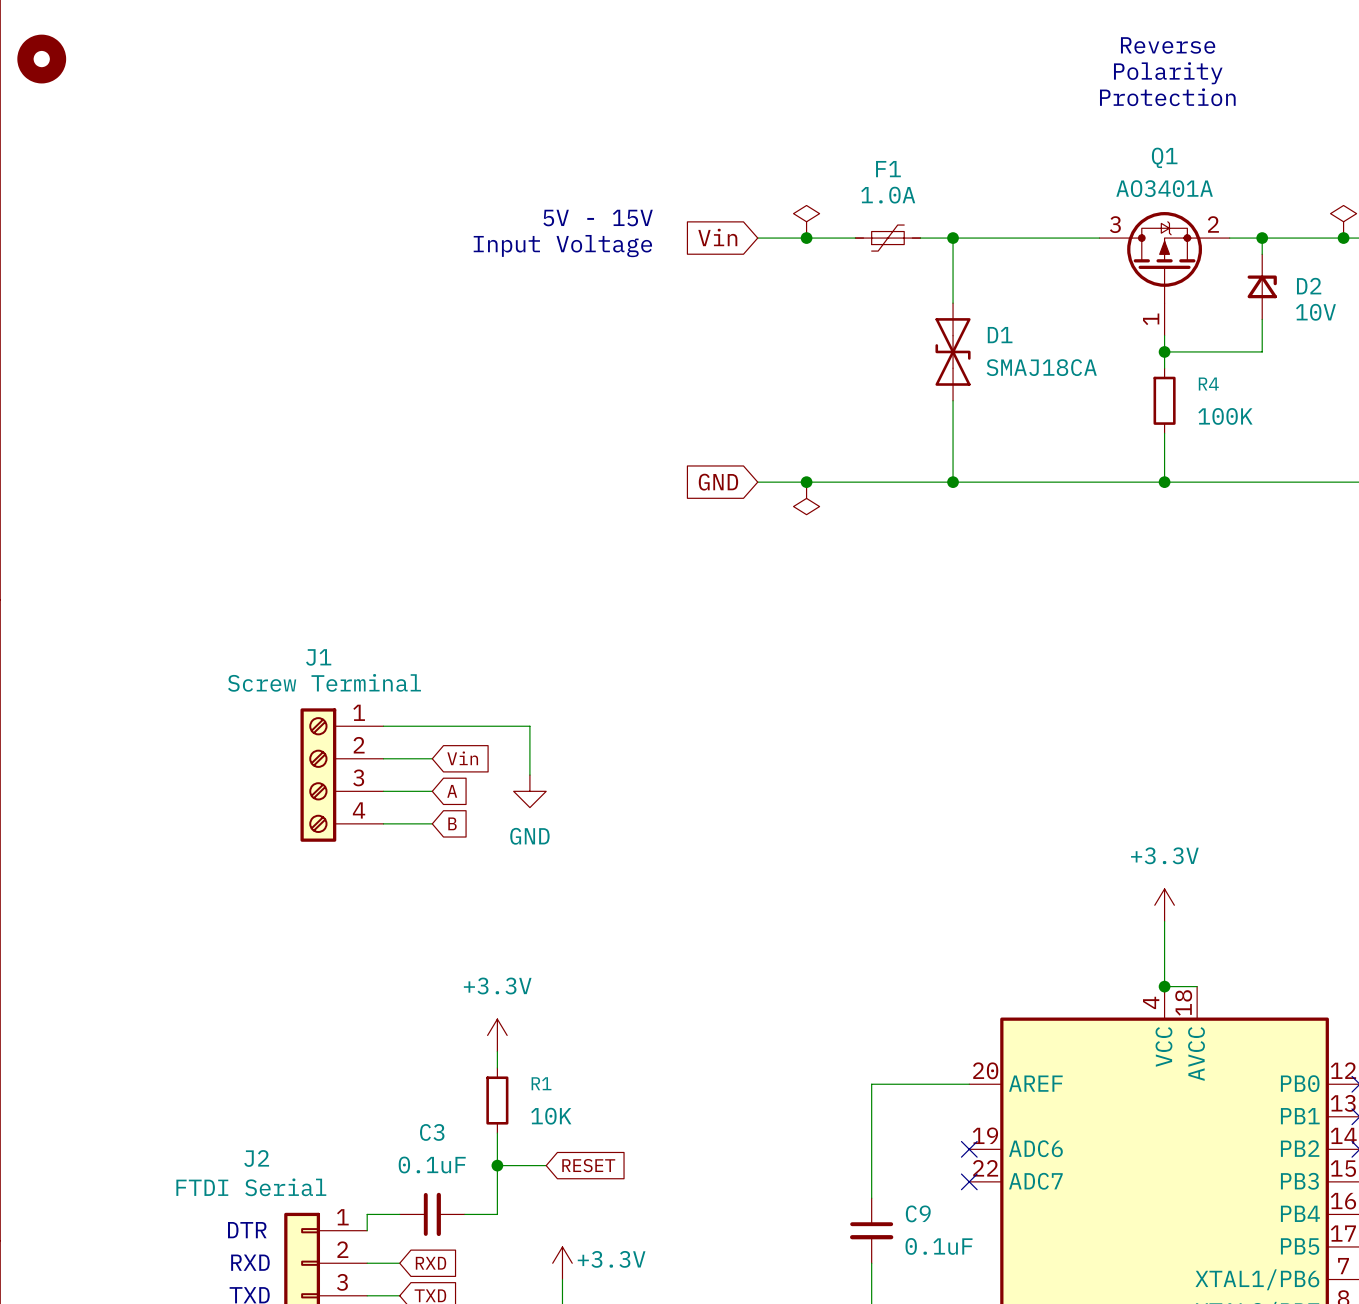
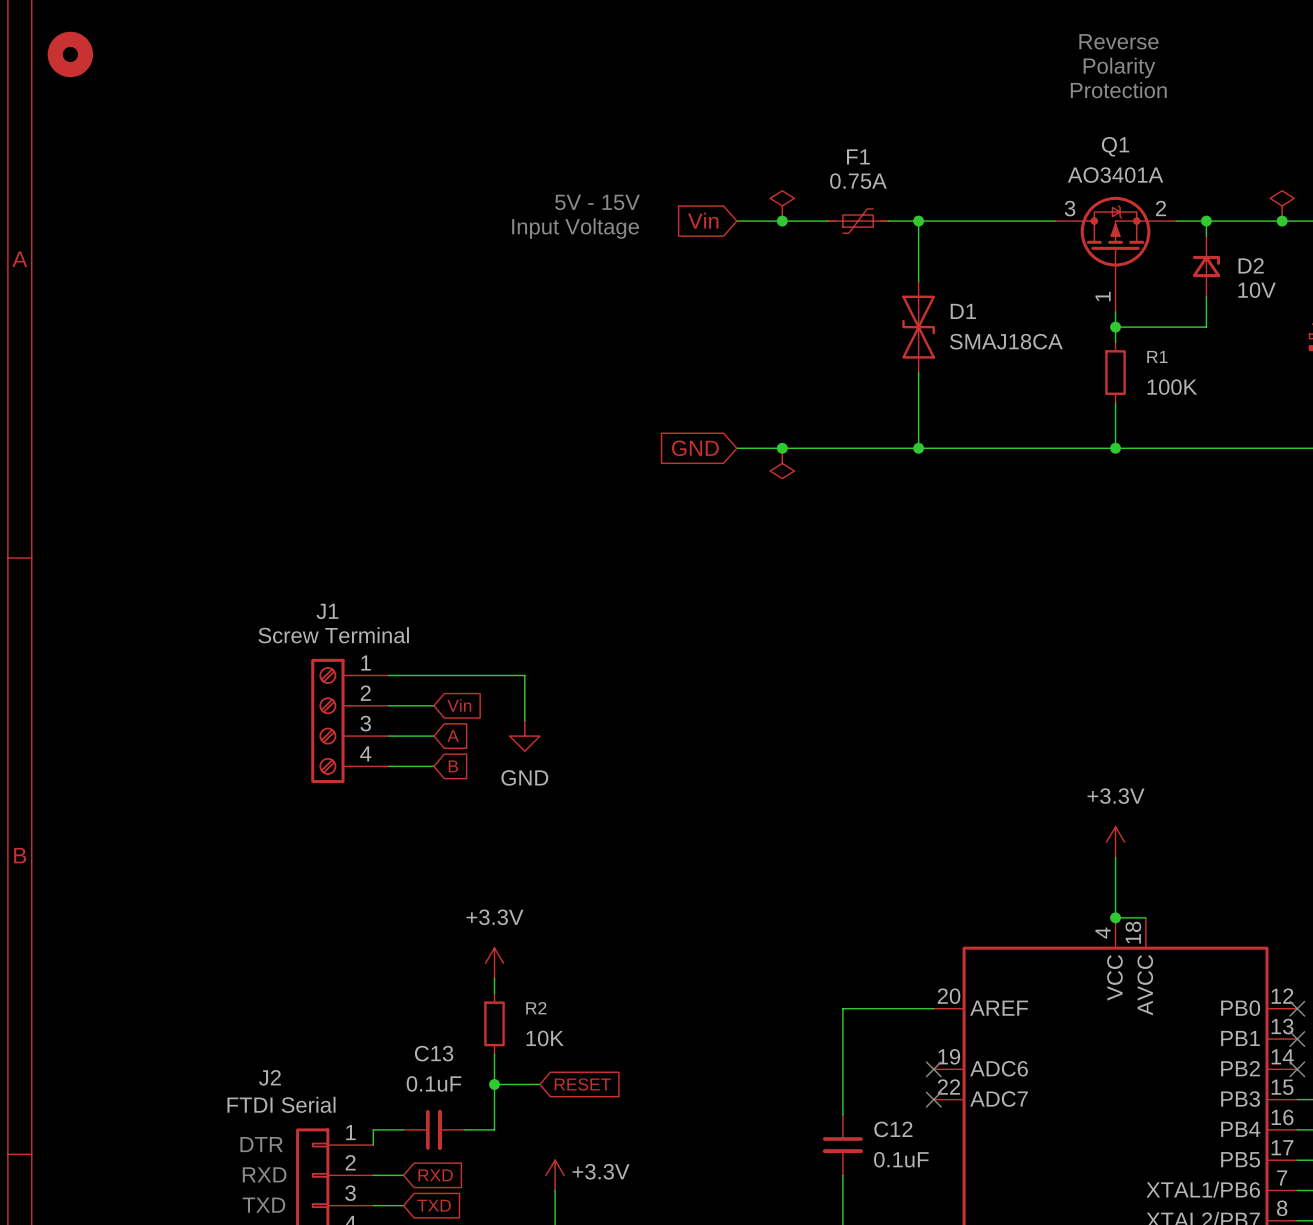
F1 value: 1.0A (888, 195) -> 0.75A (858, 181)
R4 name: R4 (1208, 384) -> R1 (1157, 356)
R1 name: R1 (541, 1083) -> R2 (536, 1008)
C3 name: C3 (432, 1132) -> C13 (434, 1053)
C9 name: C9 (918, 1213) -> C12 (893, 1129)

